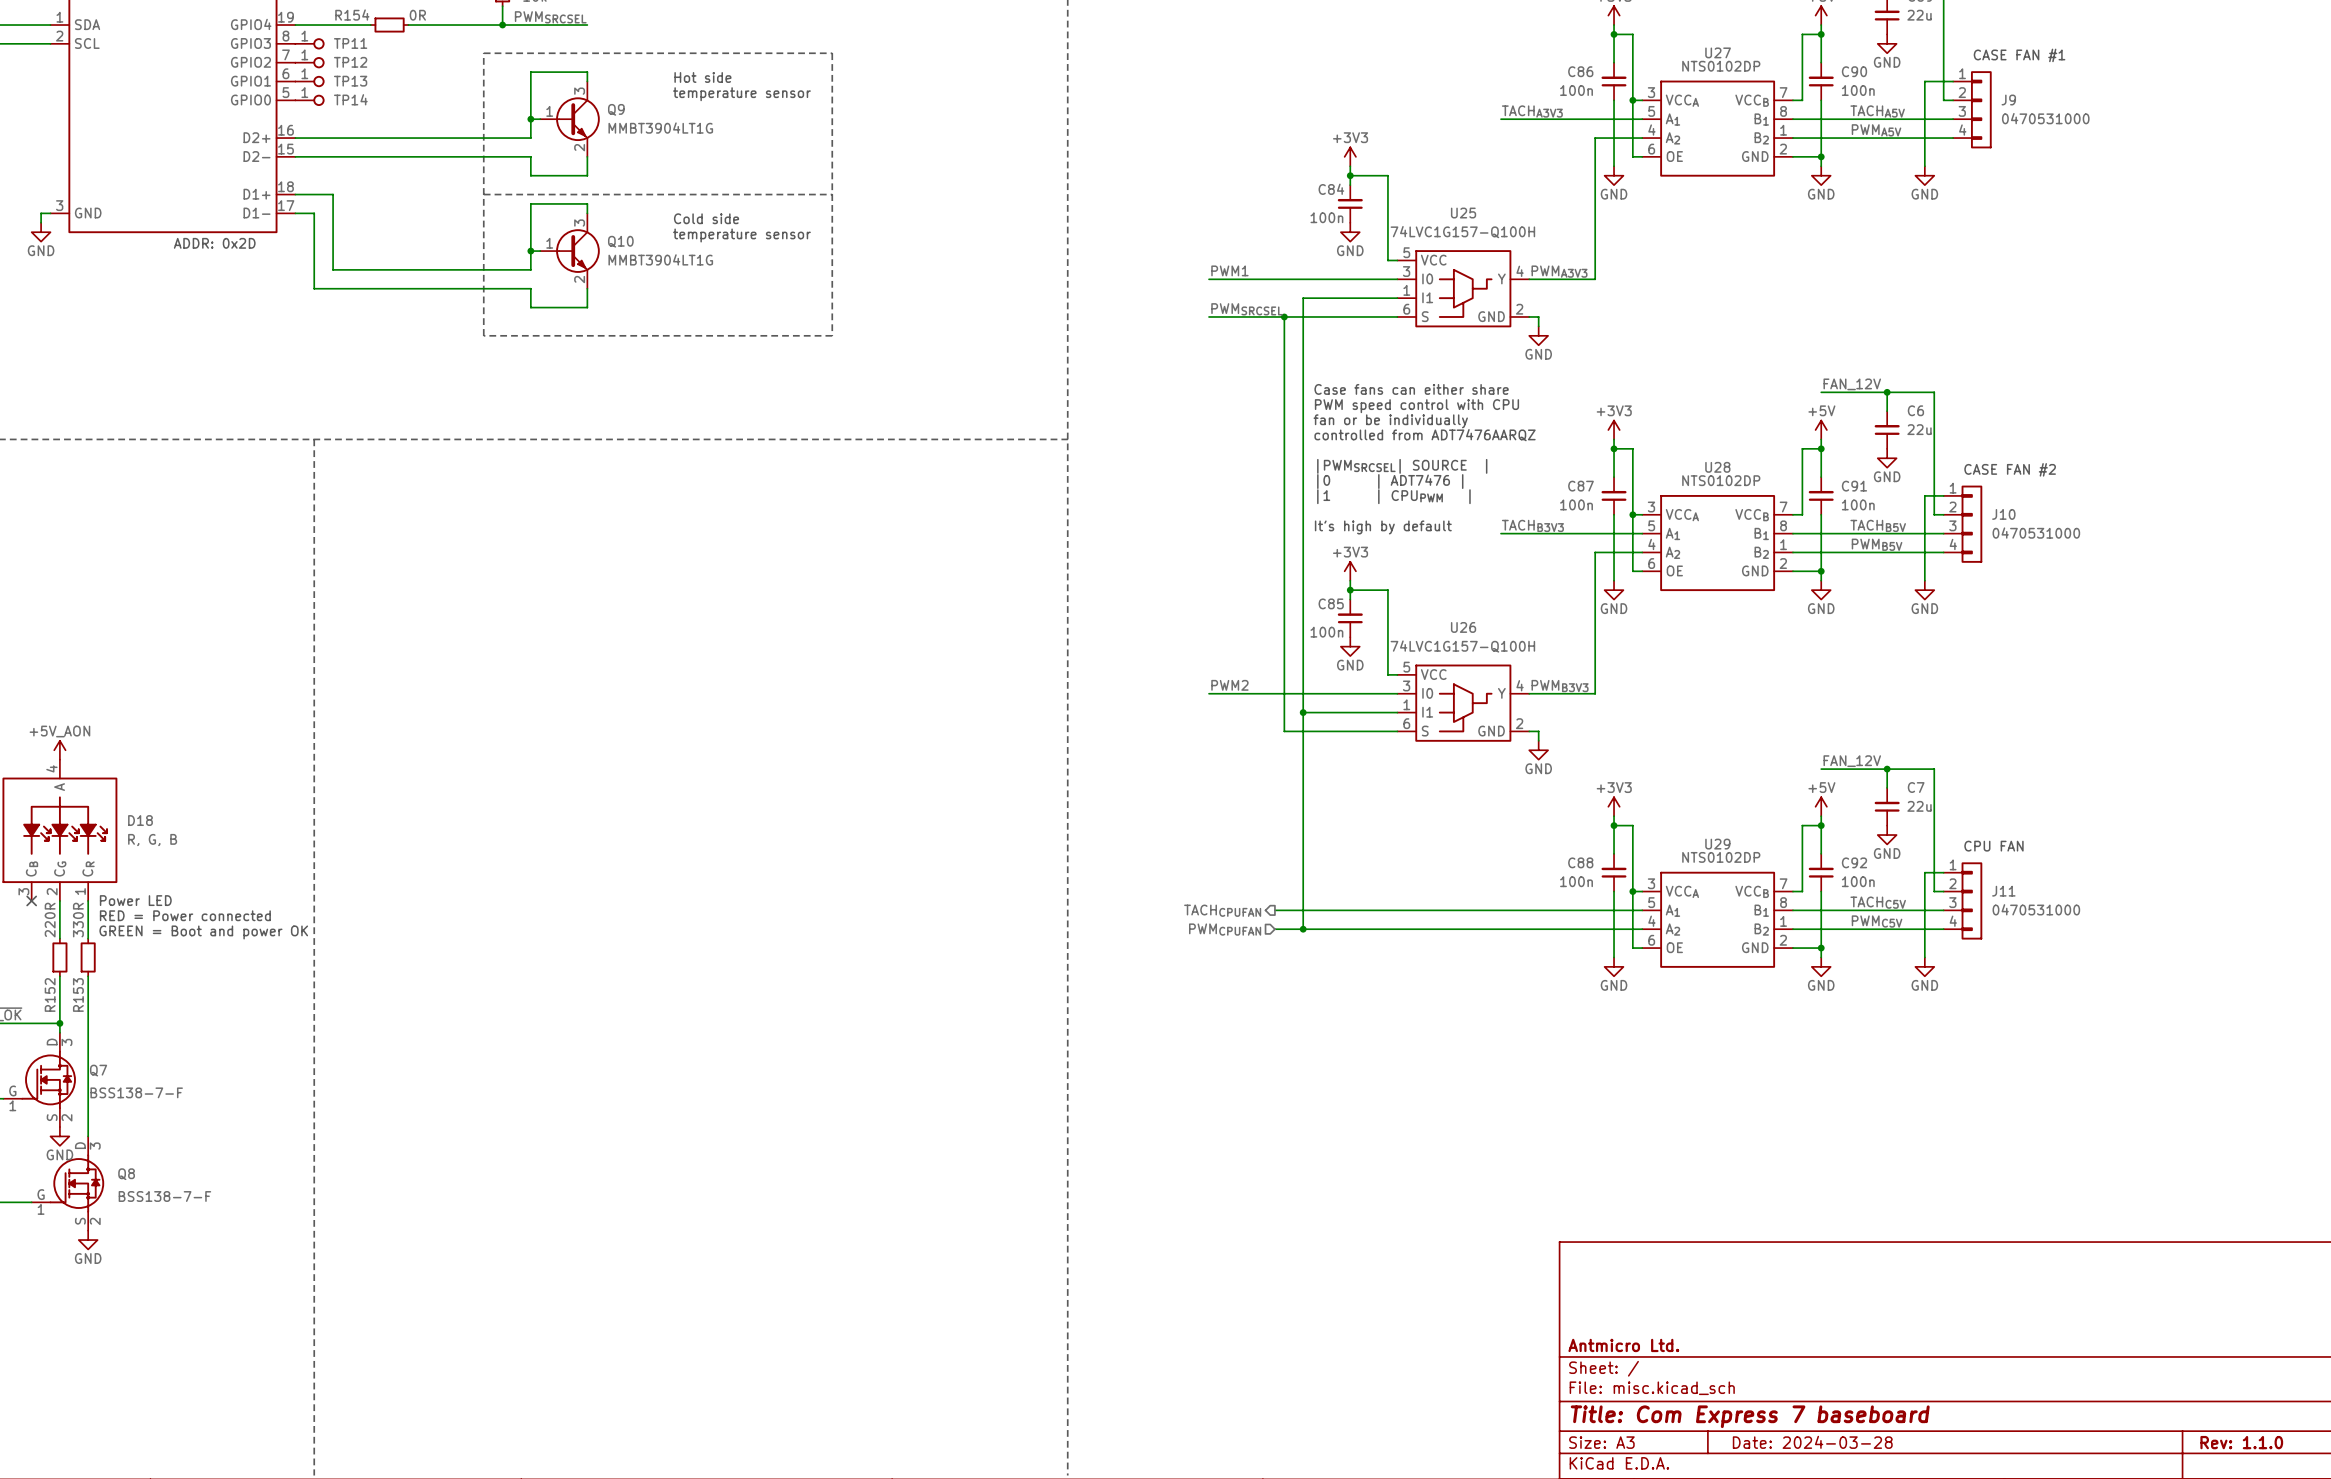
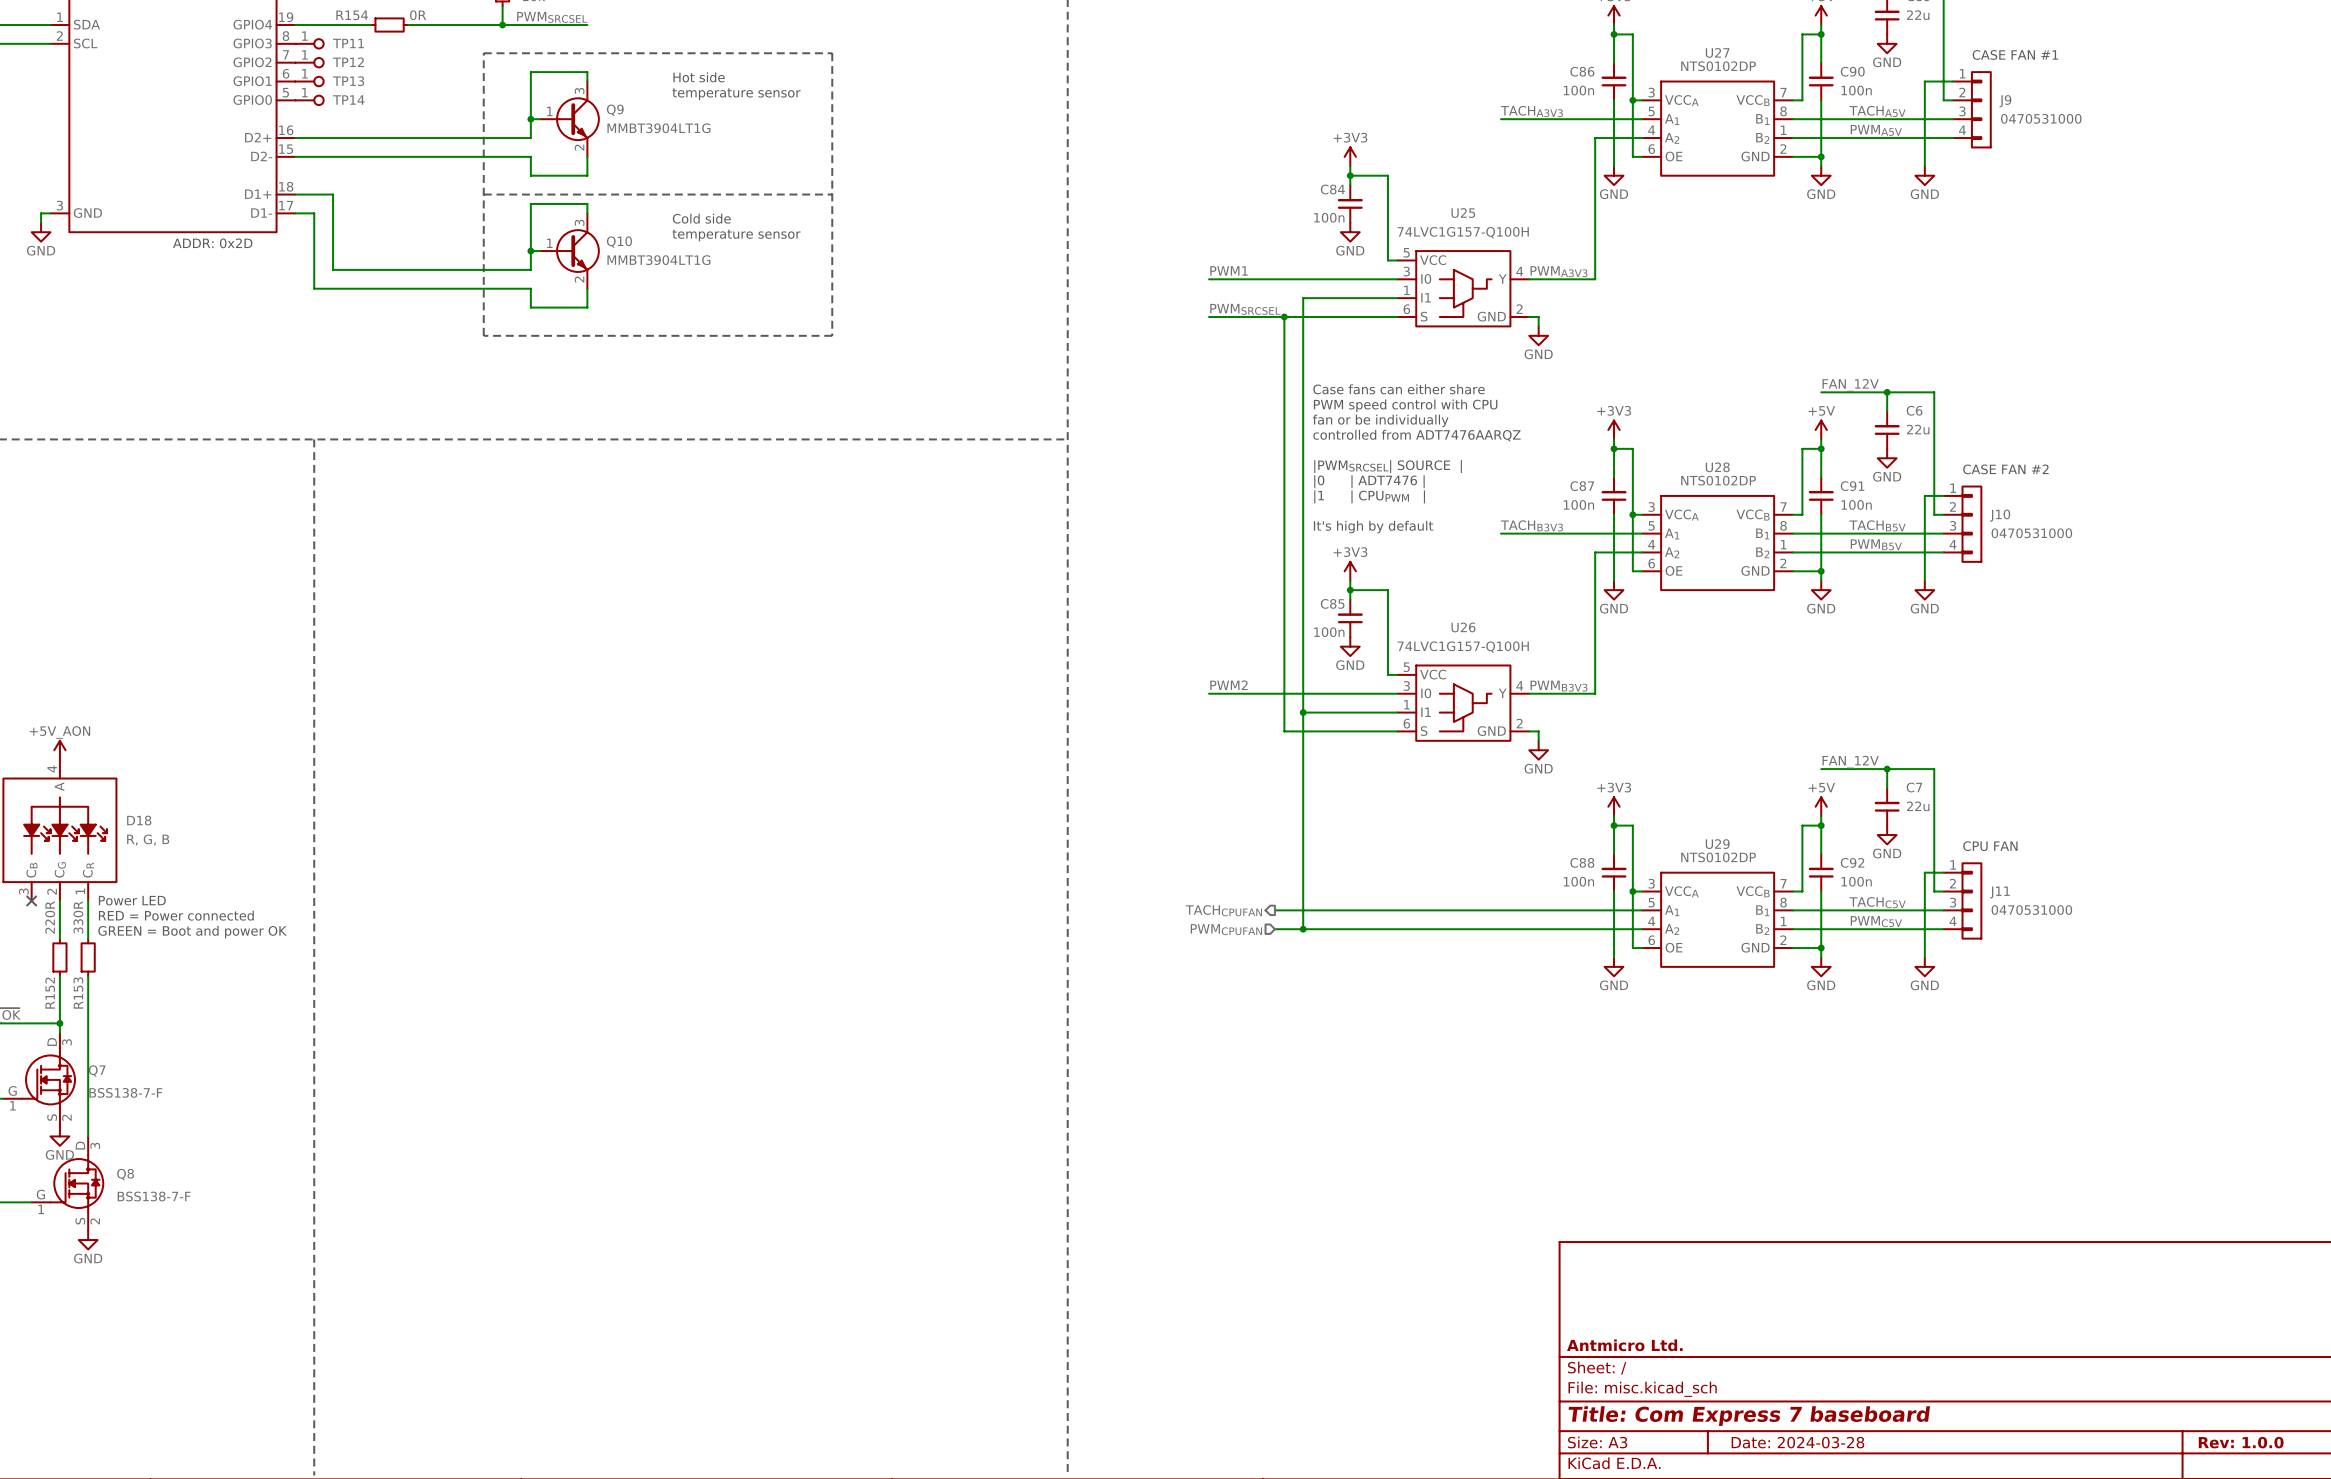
title block: Rev: 1.1.0 (2241, 1442) -> Rev: 1.0.0 (2241, 1442)

